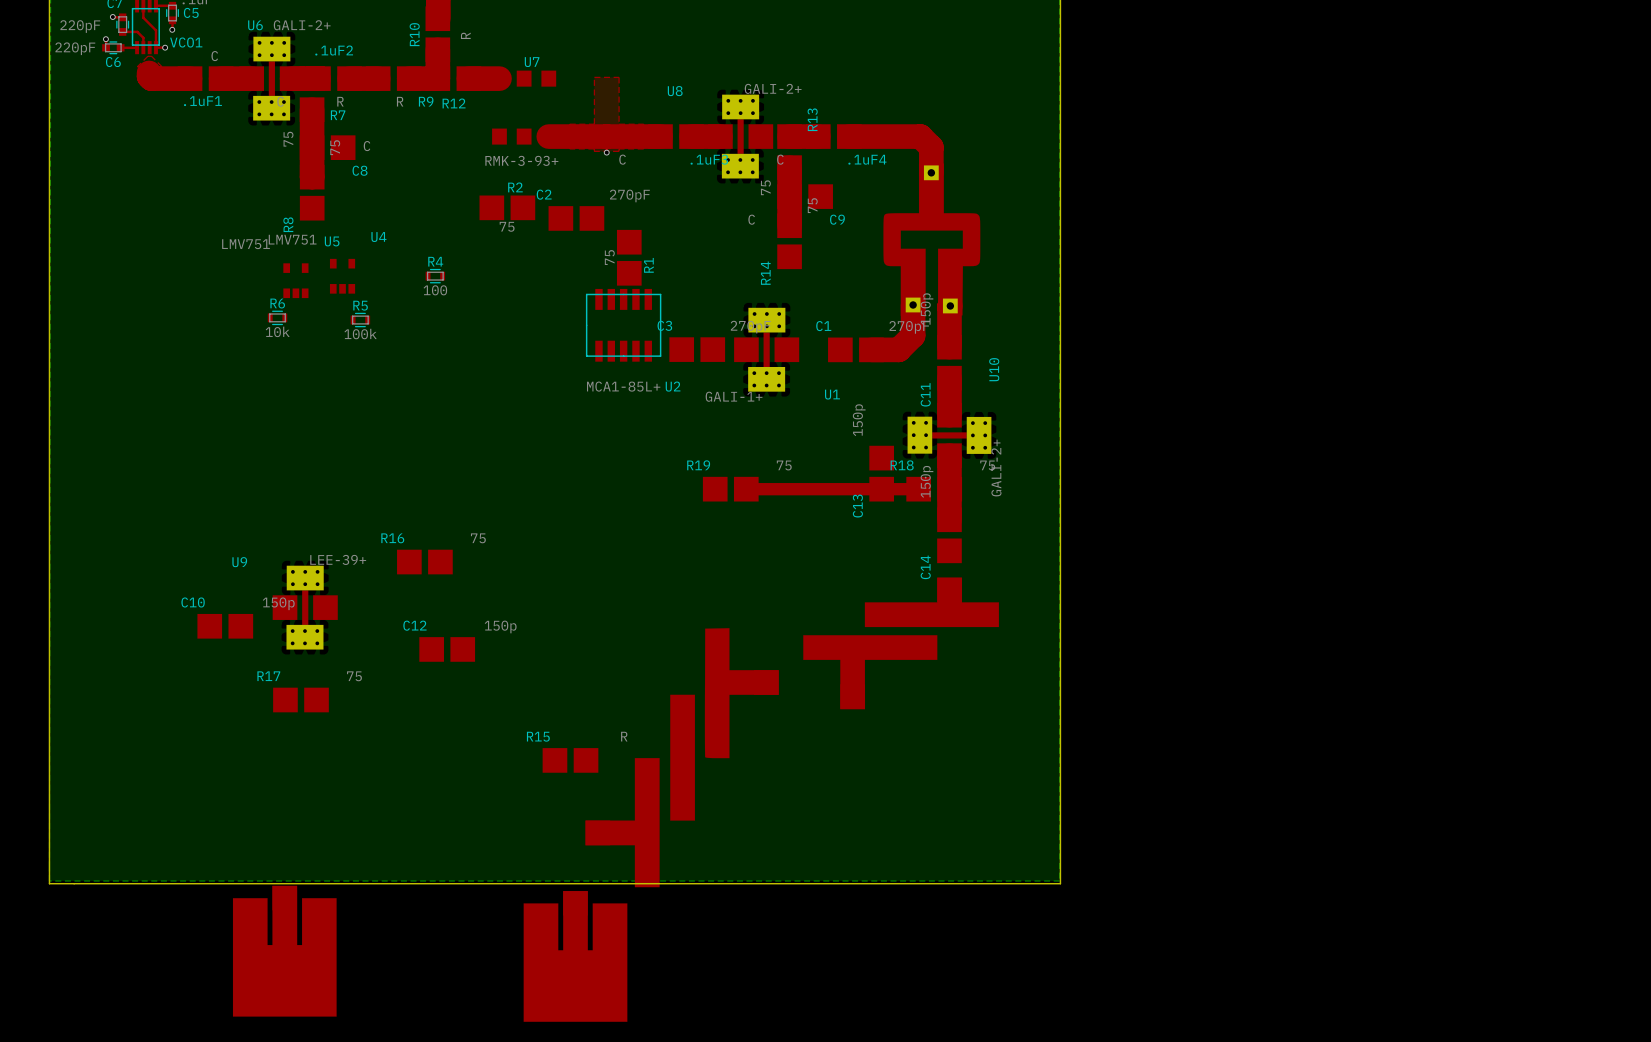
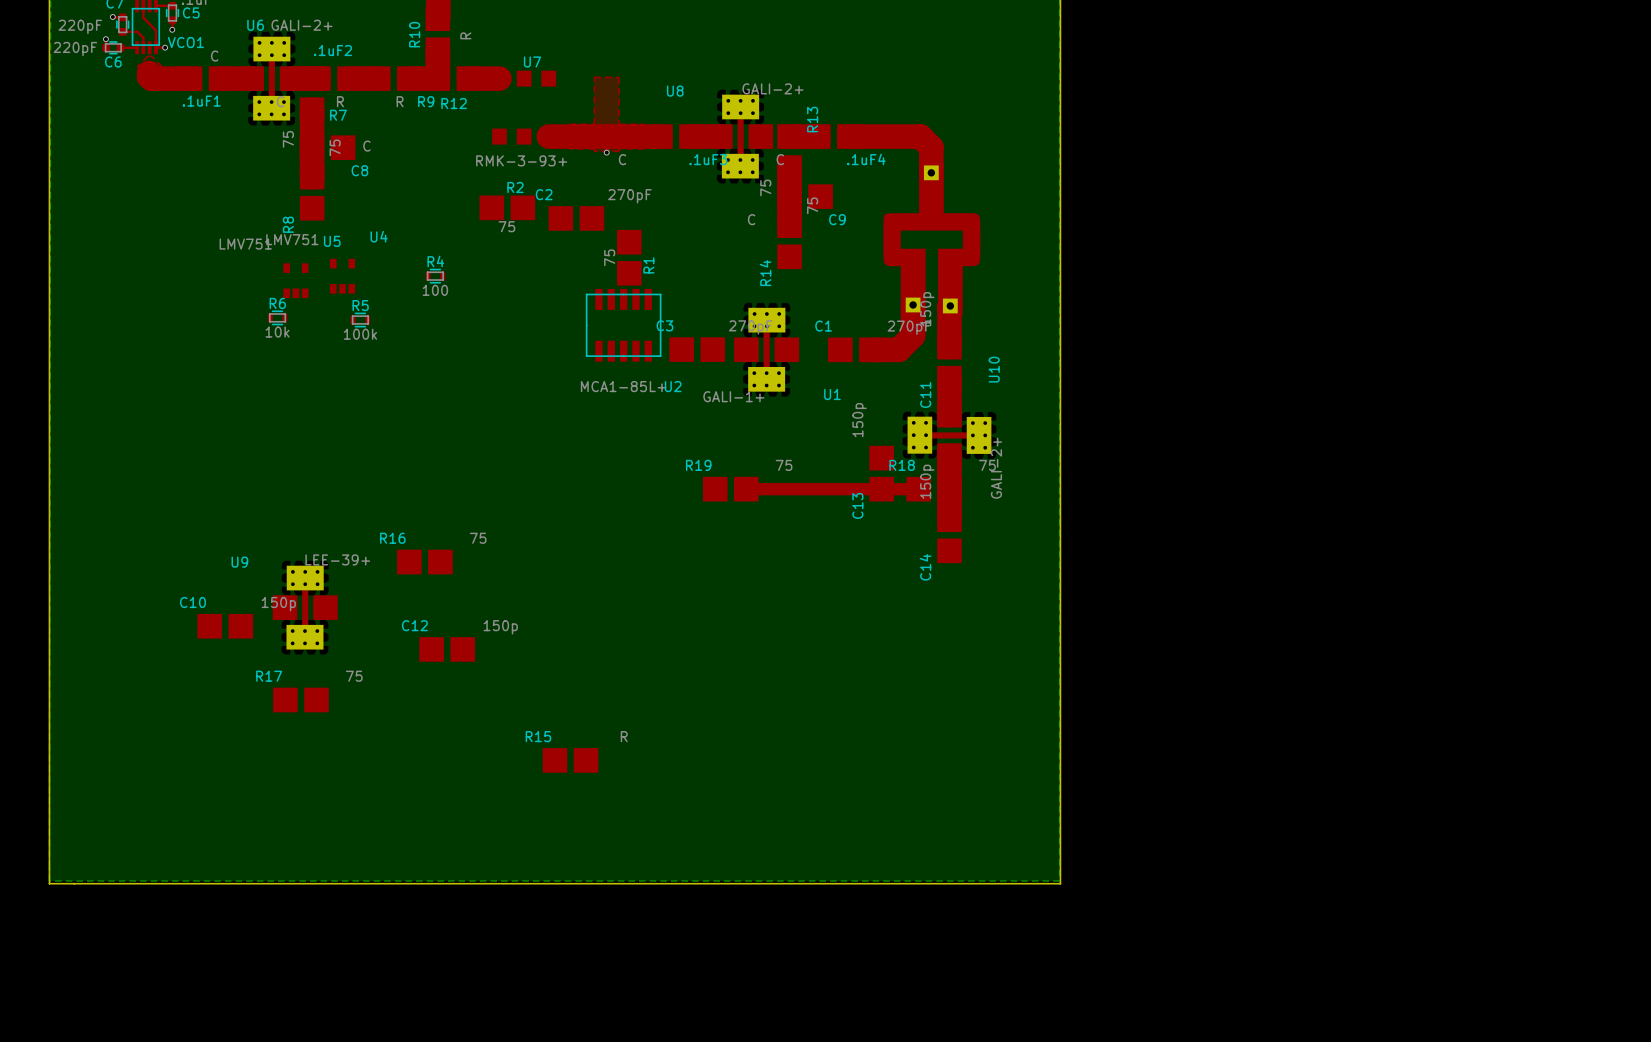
part: (901, 643) -> none
part: (682, 757) -> none
part: (284, 951) -> none
part: (575, 956) -> none

